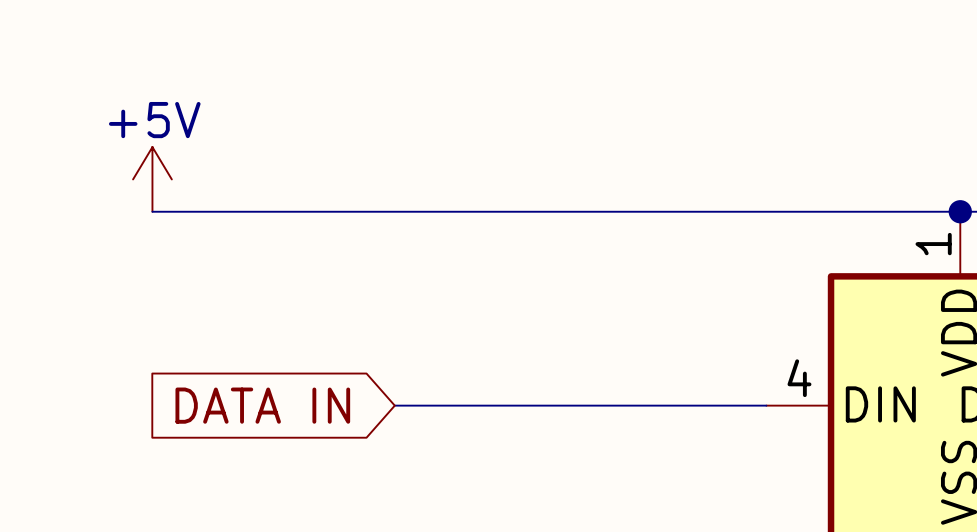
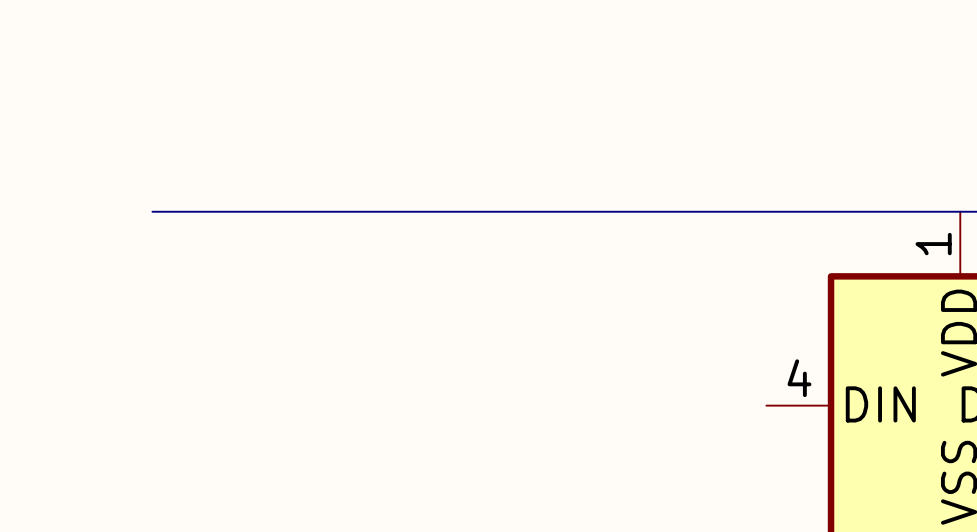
power symbol: +5V (152, 179) -> none
junction: (960, 211) -> none
global label: DATA IN (262, 405) -> none
wire: (394, 405) (766, 405) -> none

